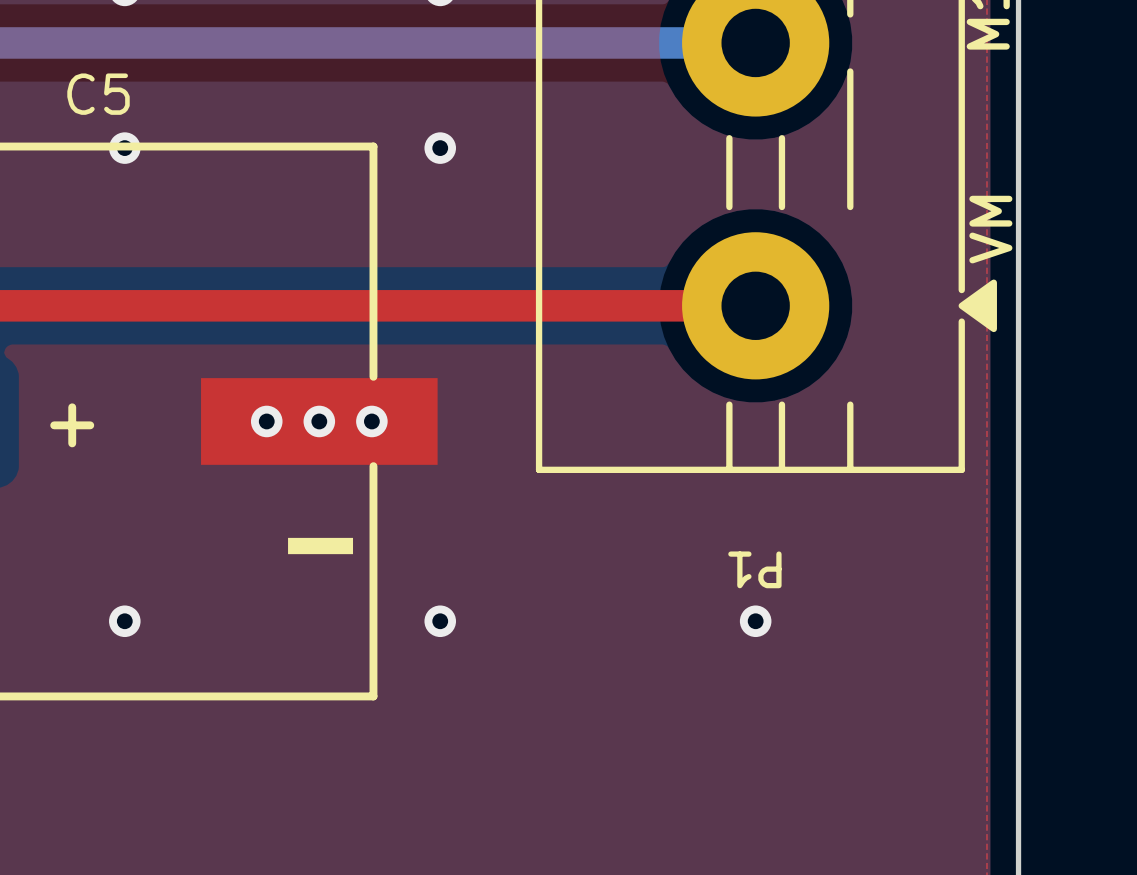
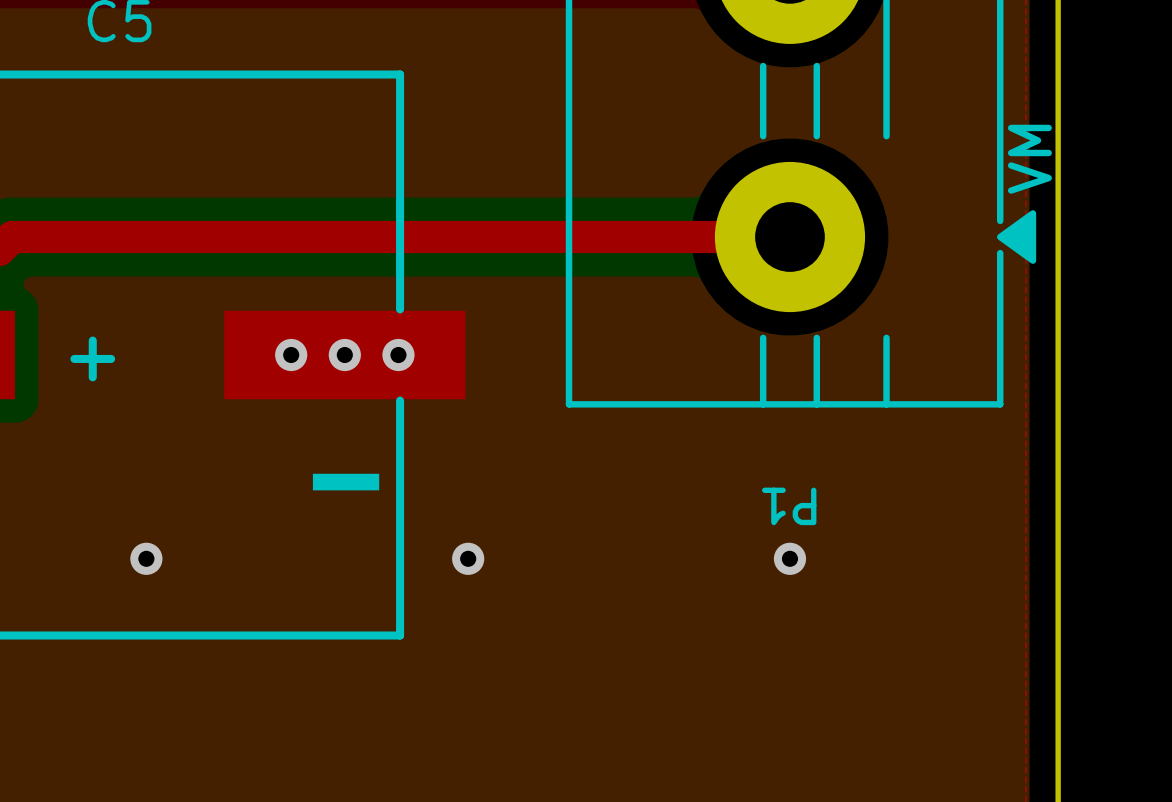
via: (124, 148) -> none
via: (440, 148) -> none

